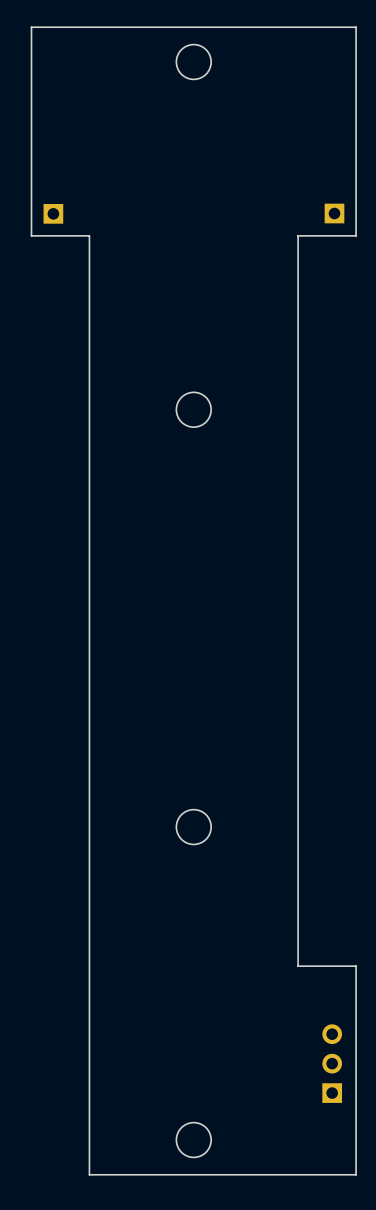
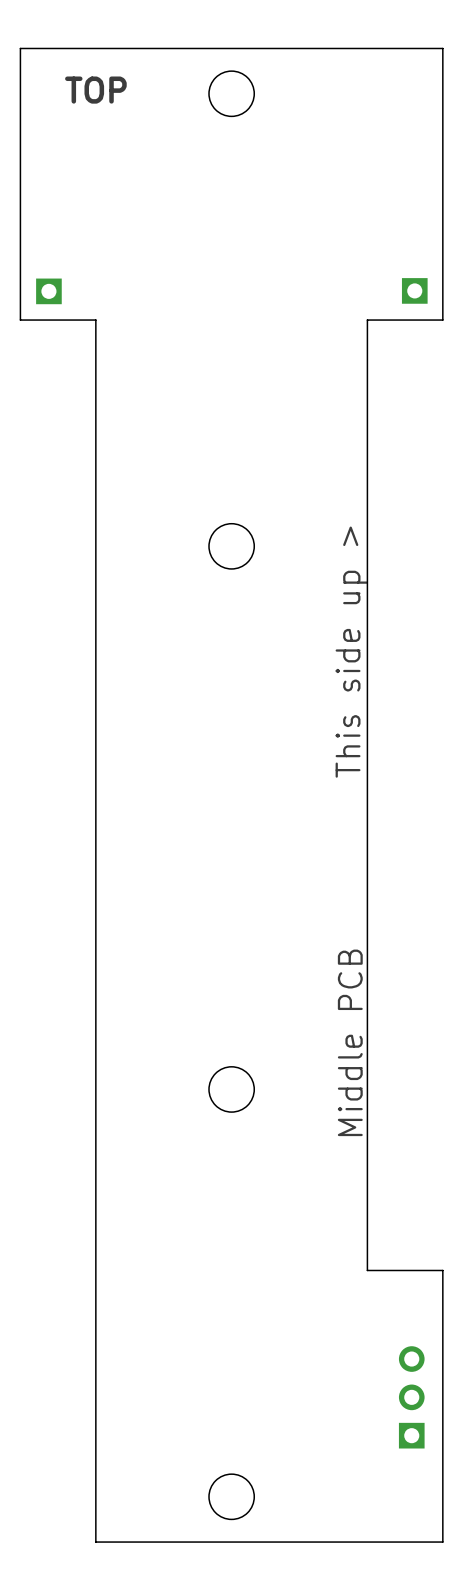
text: none -> TOP (95, 90)
text: none -> This side up > (351, 652)
text: none -> Middle PCB (350, 1042)

